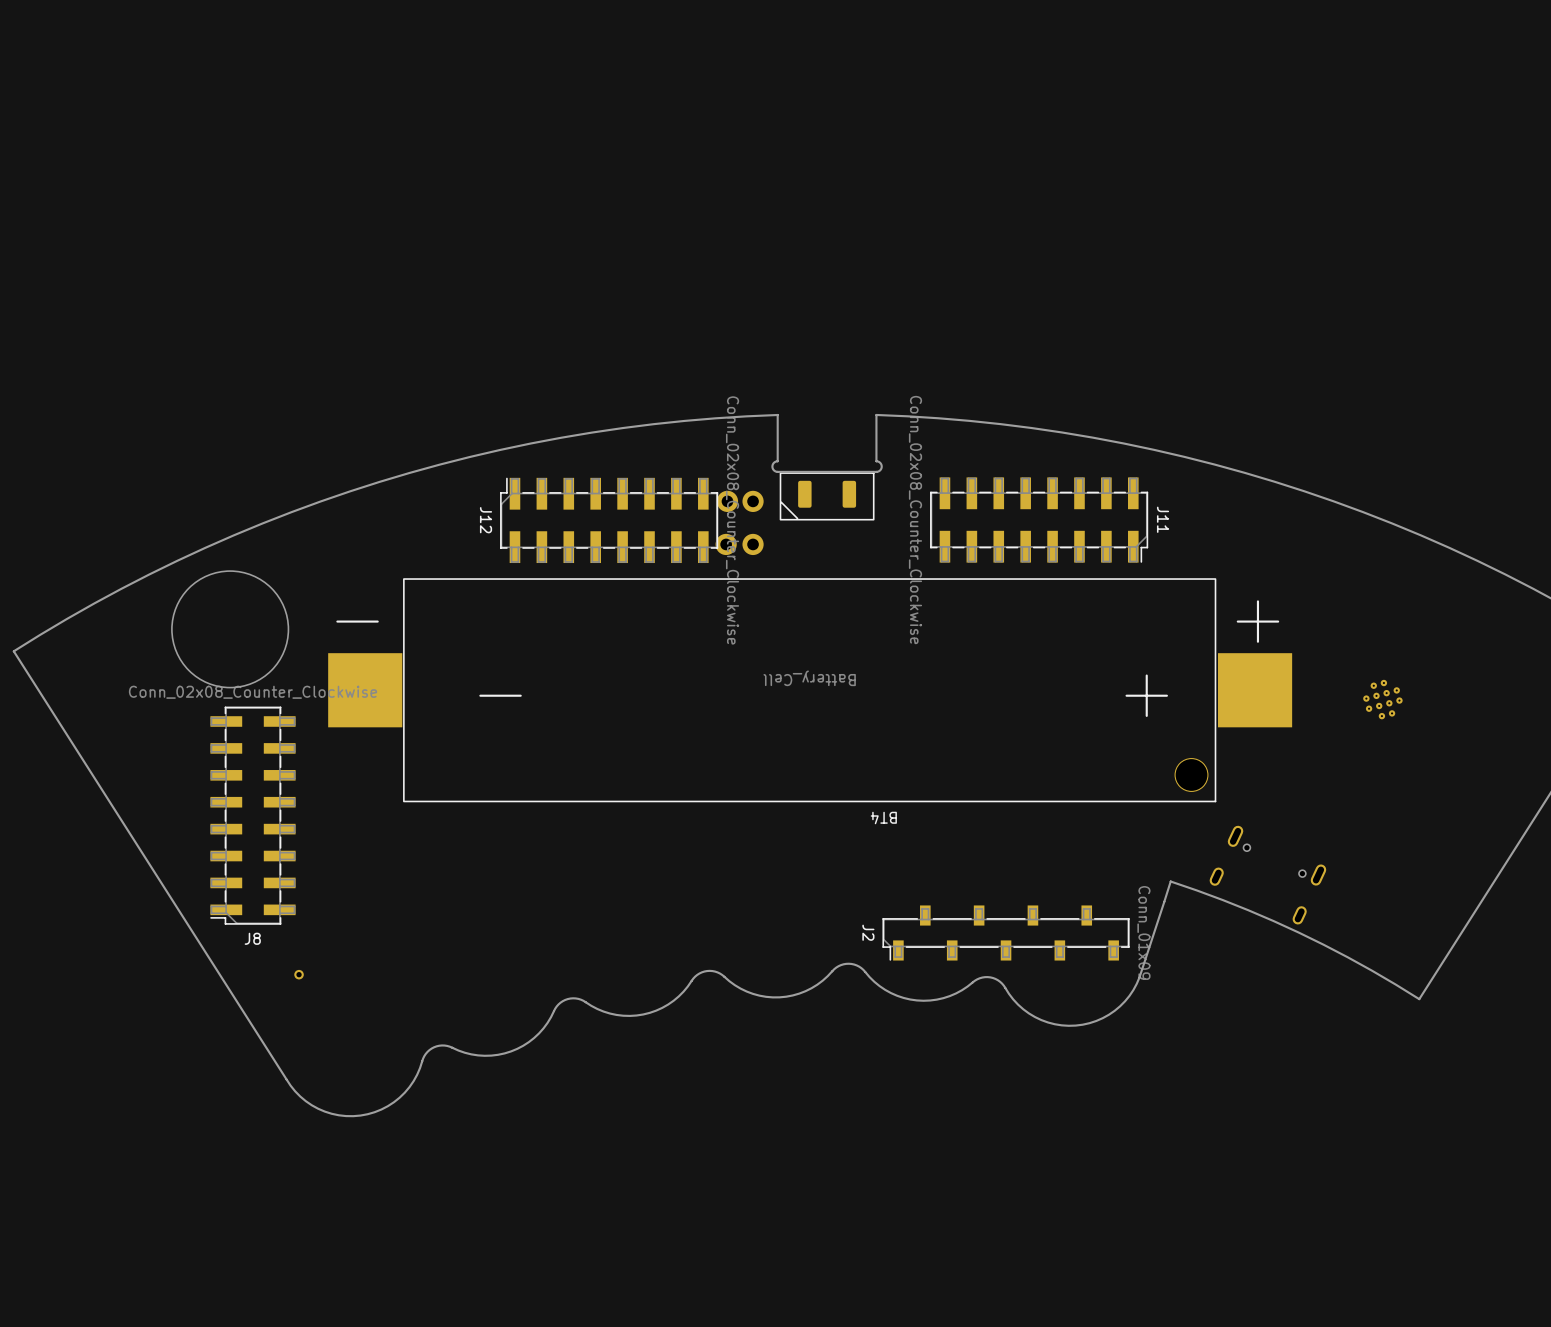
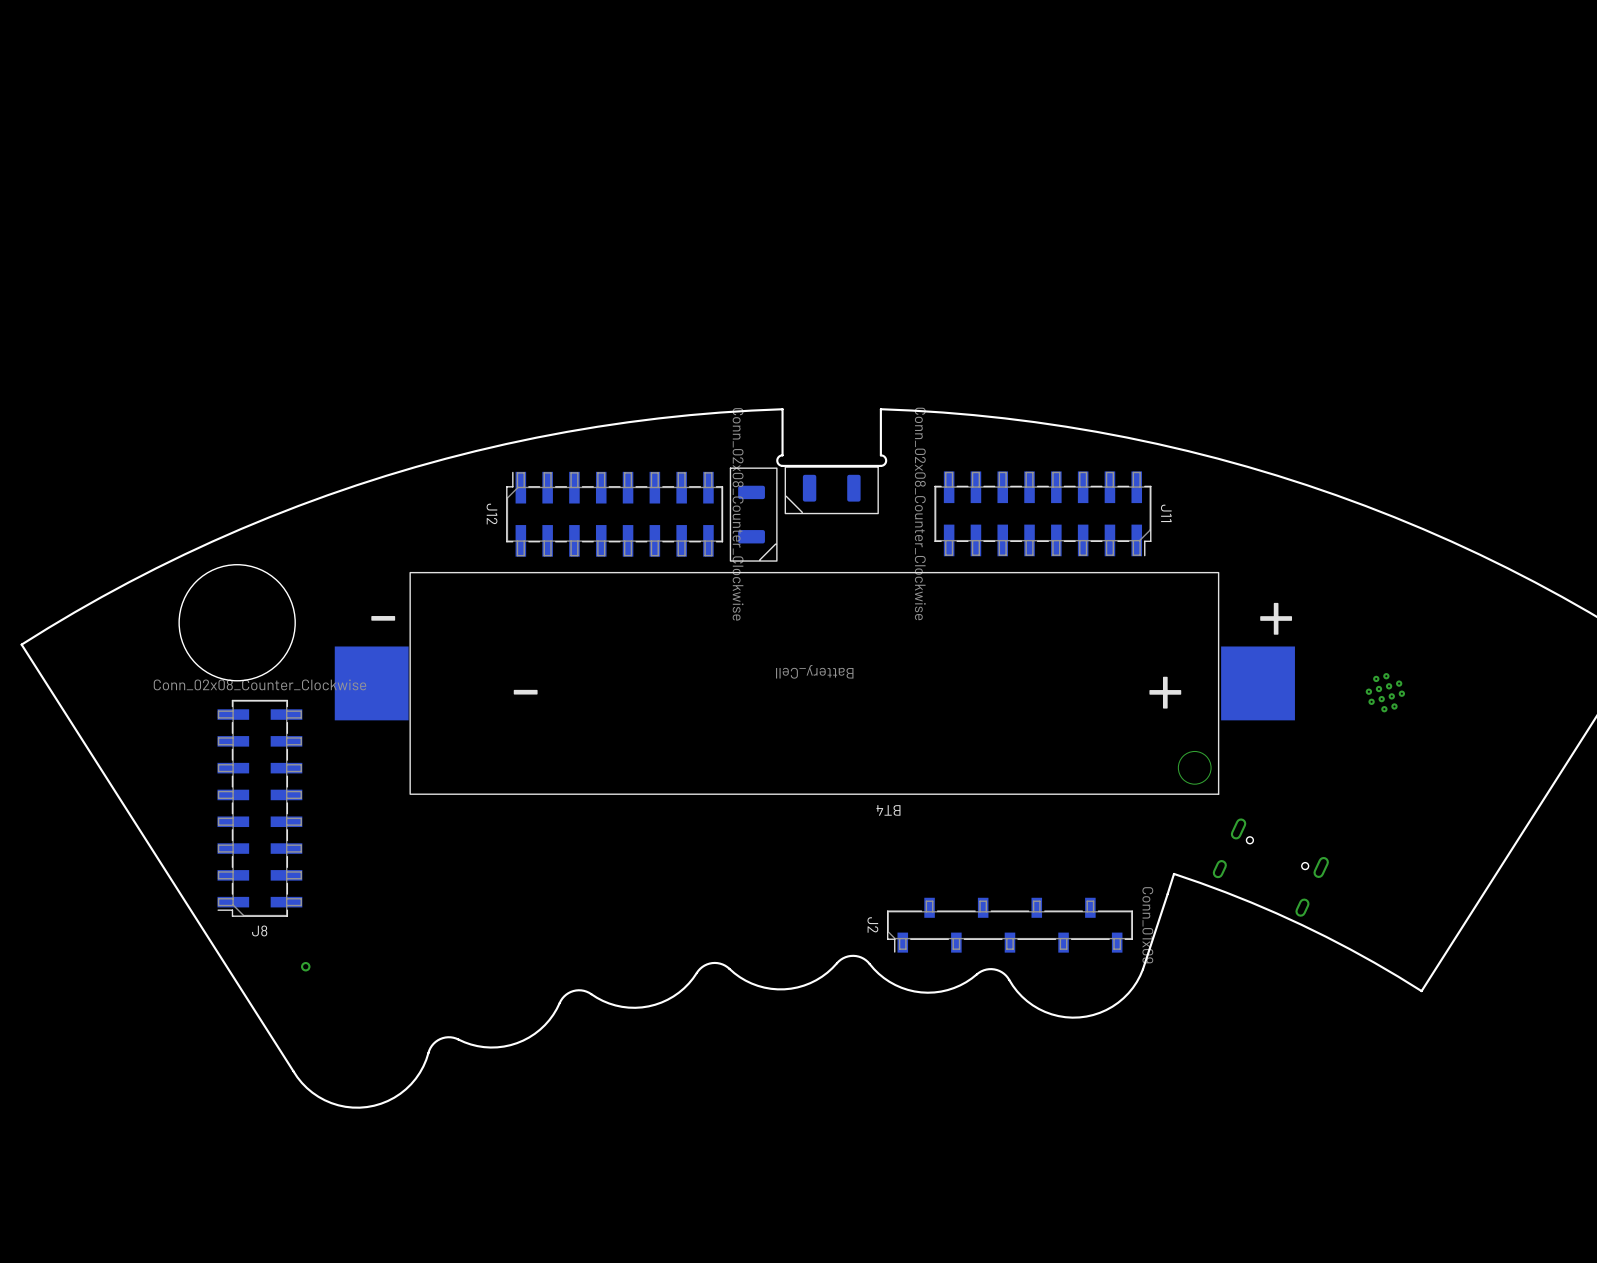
part footprint: [715, 490, 764, 556] -> [729, 467, 778, 562]

